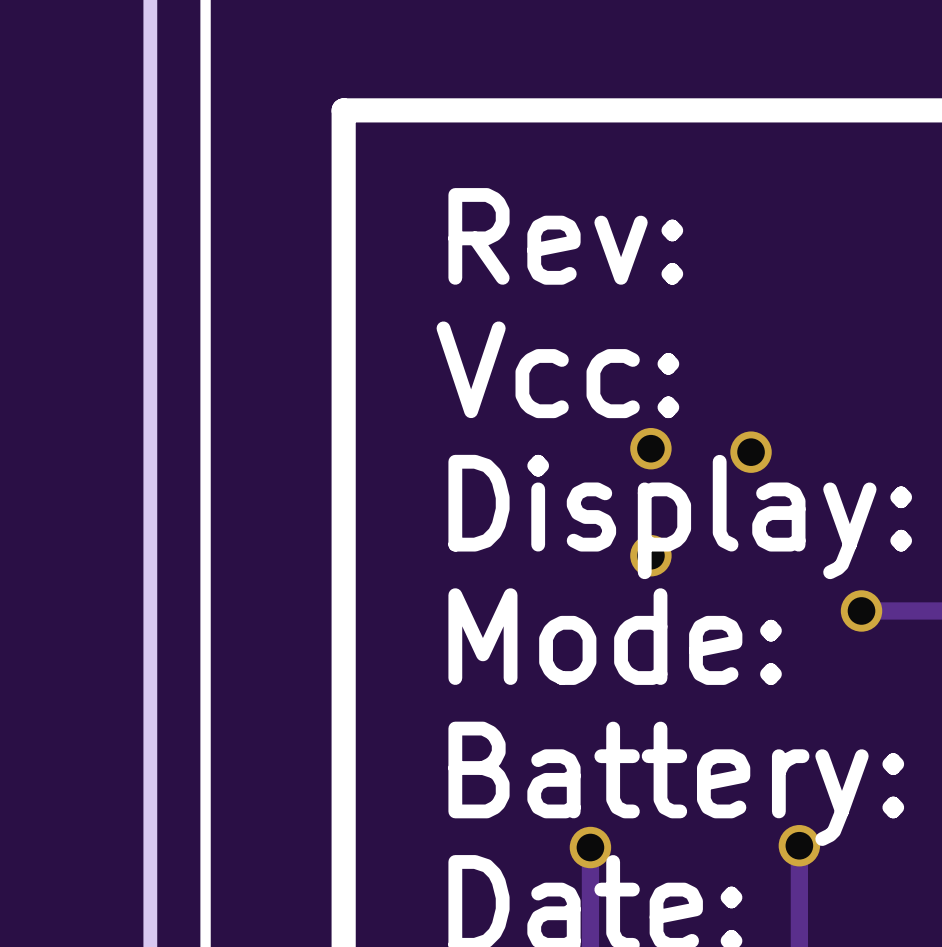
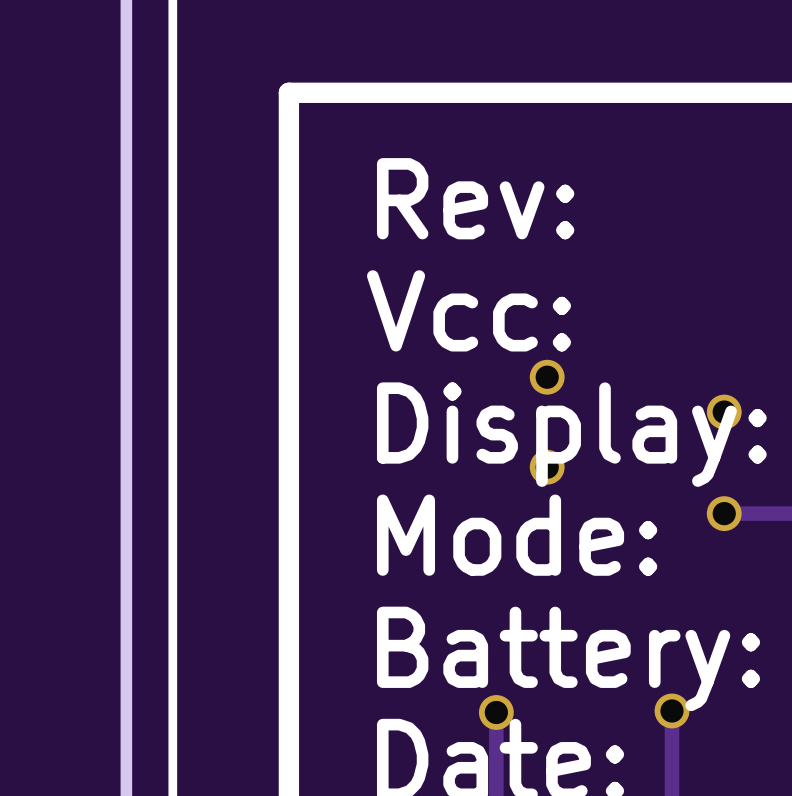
via: (751, 452) -> none
via: none -> (724, 412)

